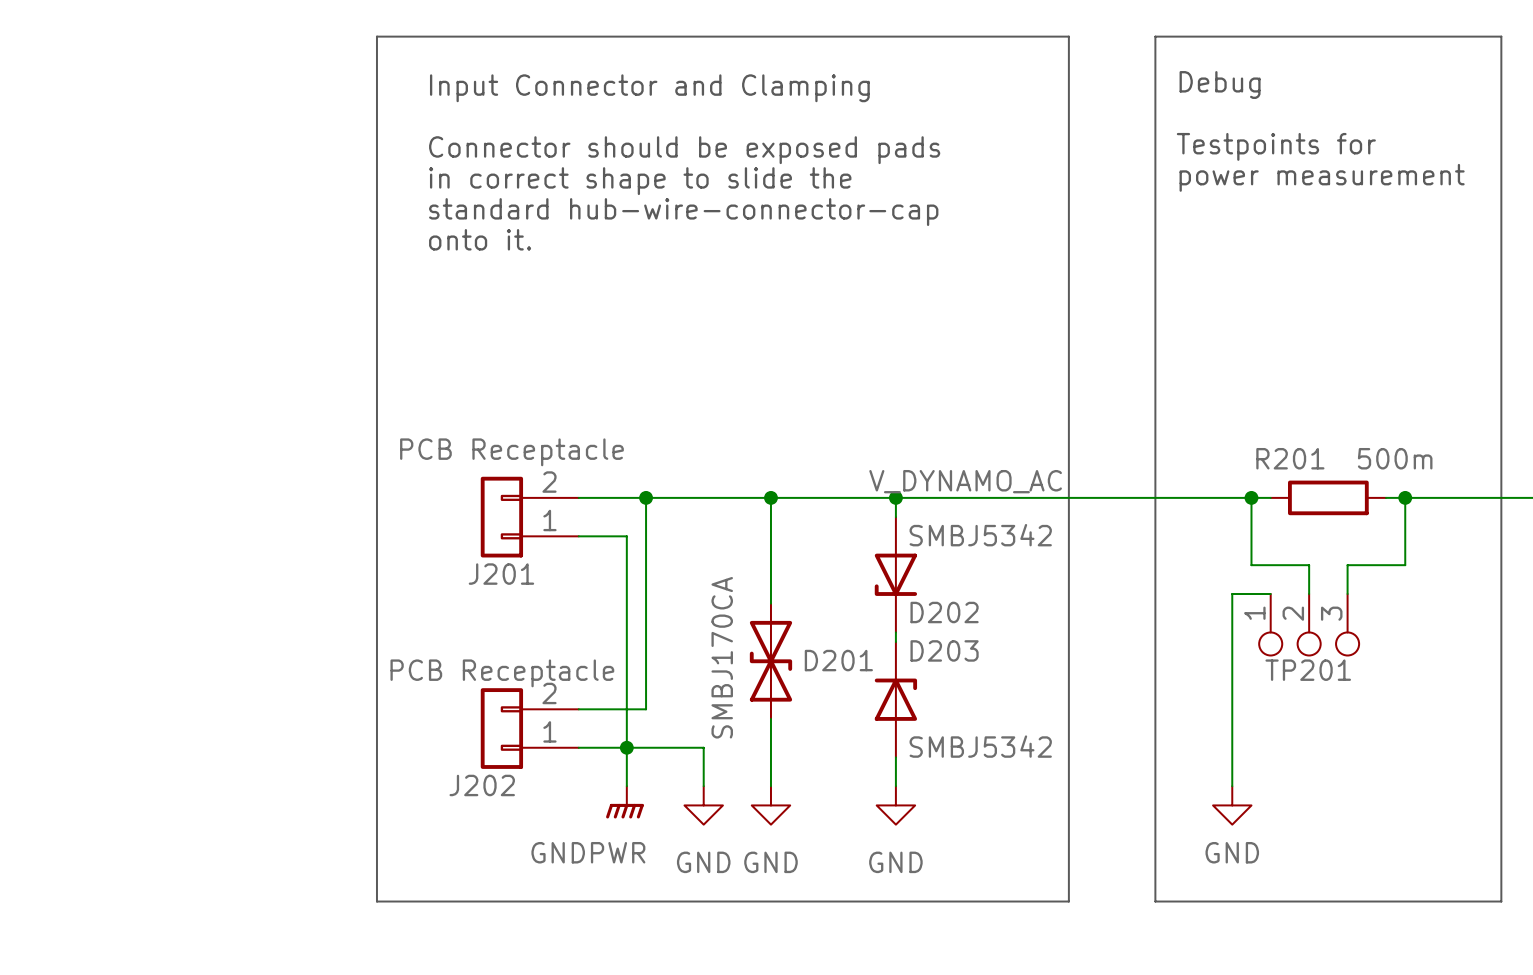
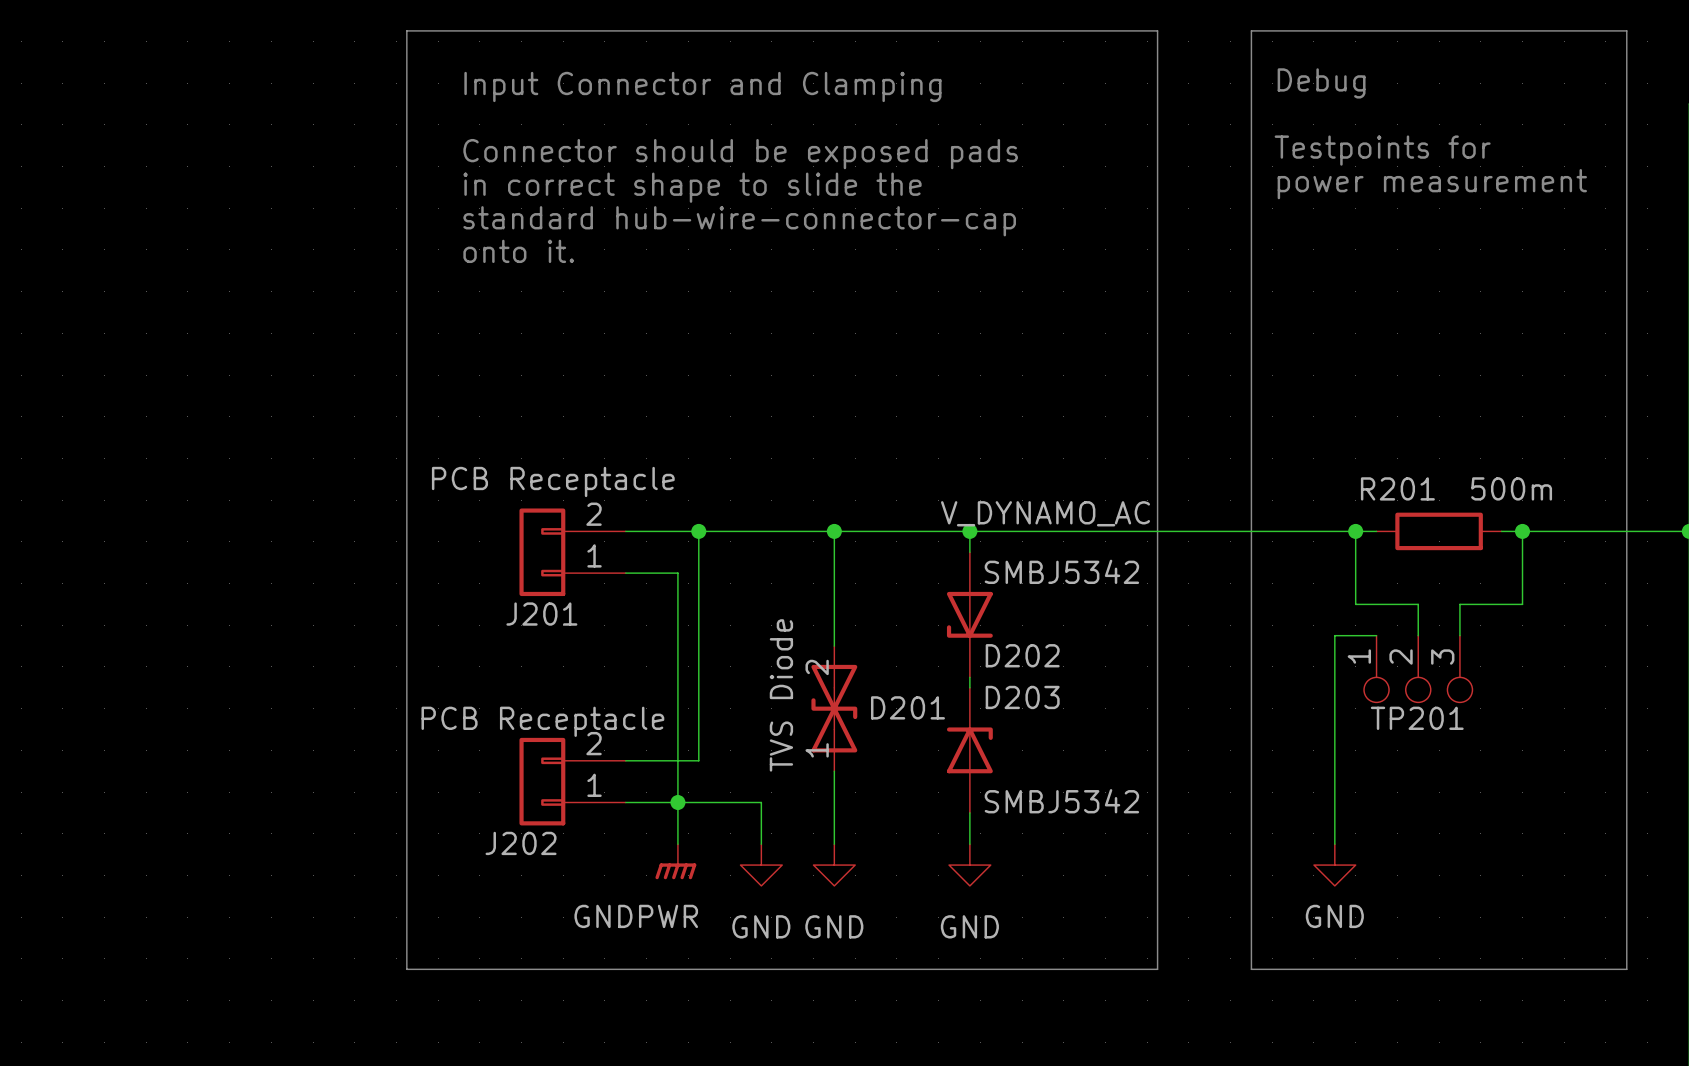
D201 pin number: none -> 2 (817, 667)
D201 value: SMBJ170CA (722, 657) -> TVS Diode (781, 695)
D201 pin number: none -> 1 (817, 750)

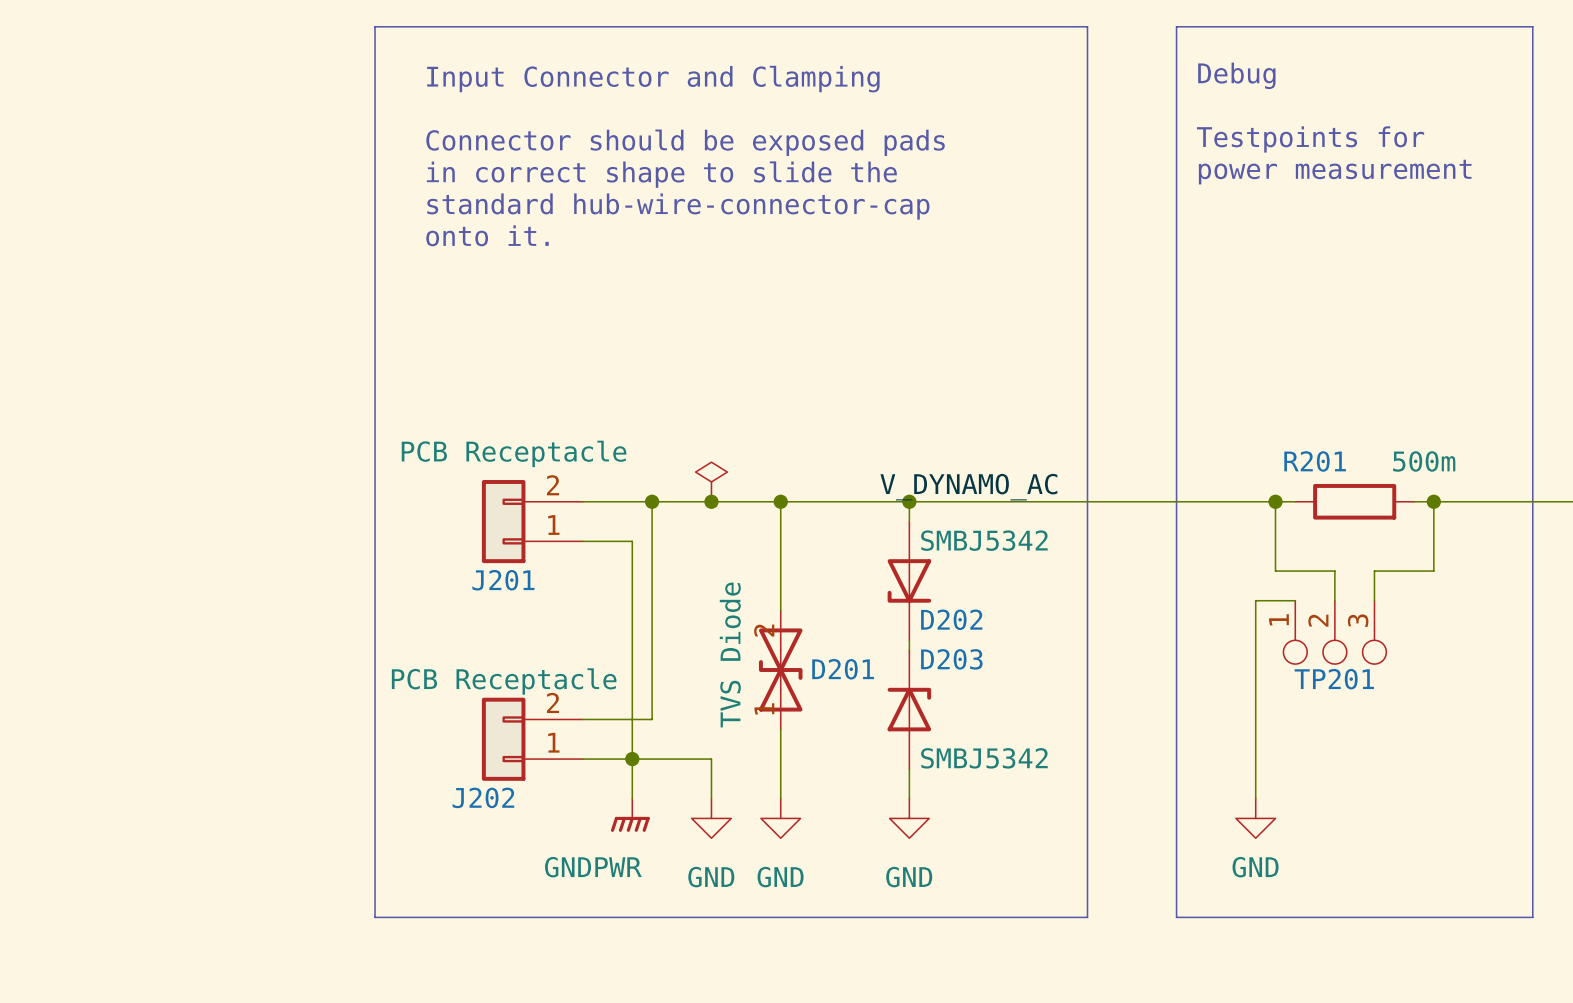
power symbol: none -> (711, 481)
junction: none -> (711, 501)

